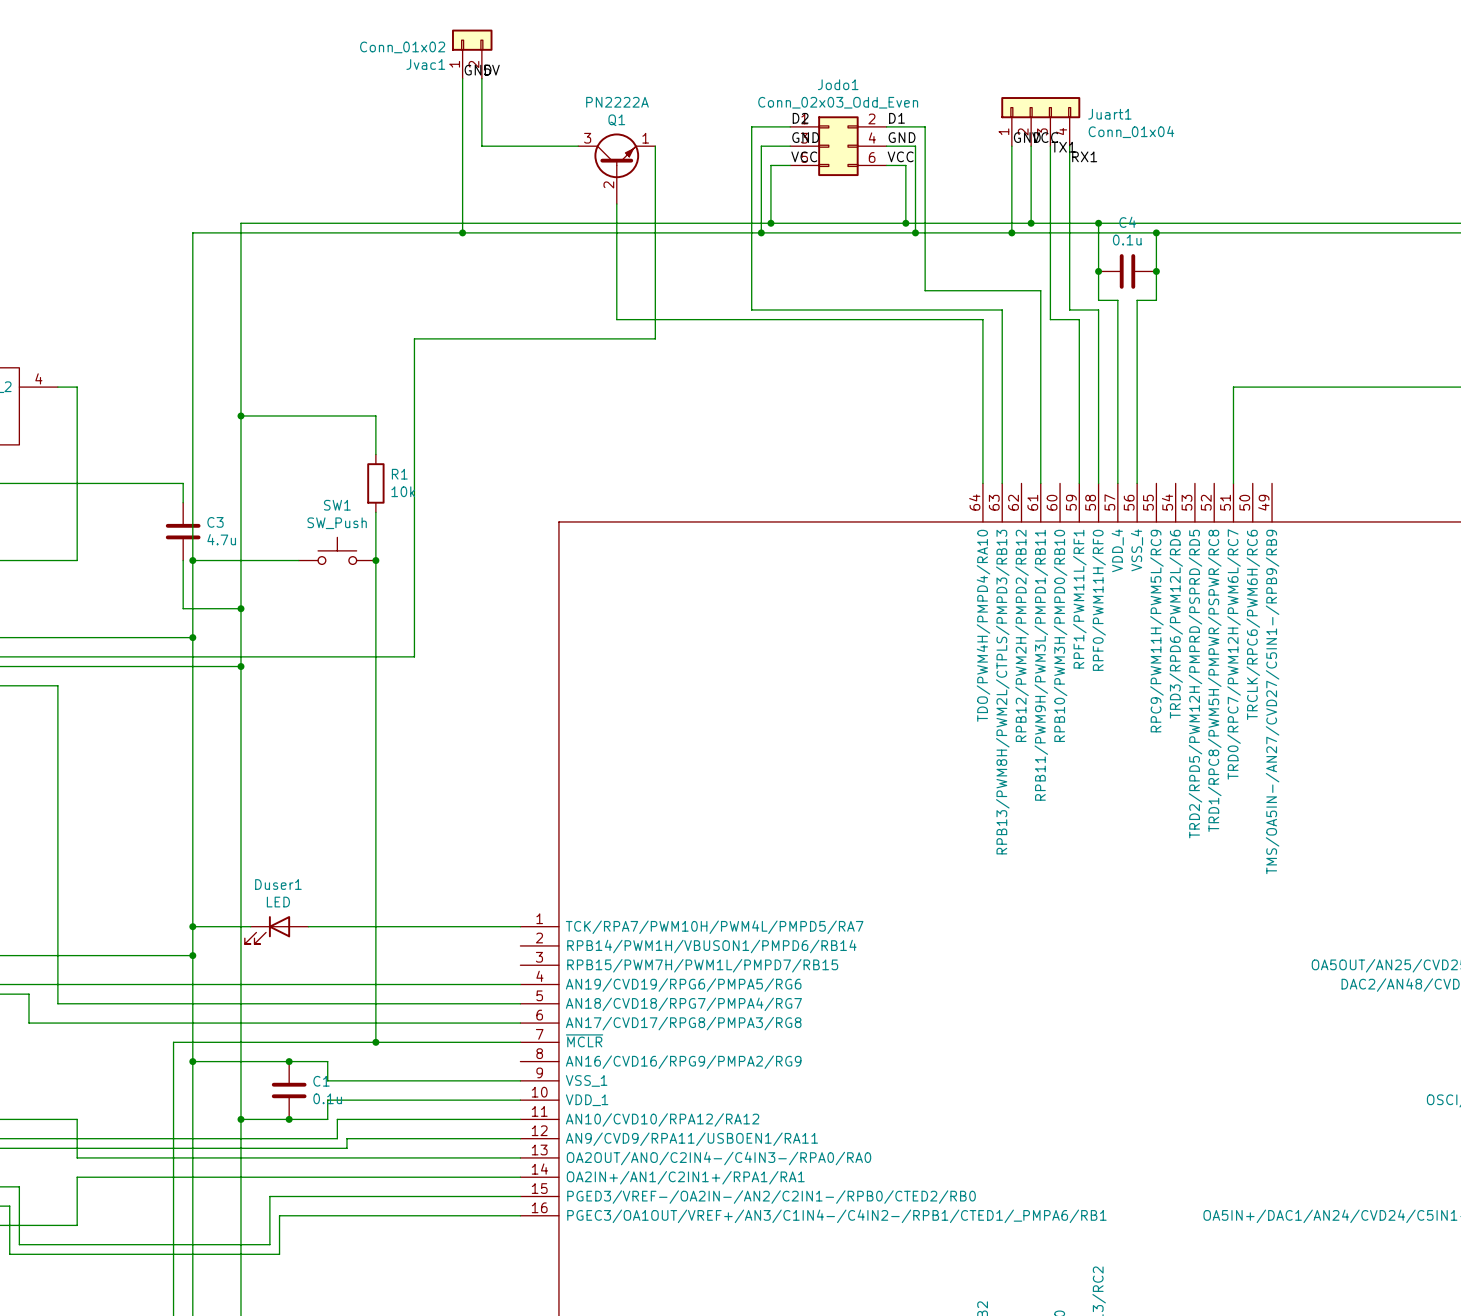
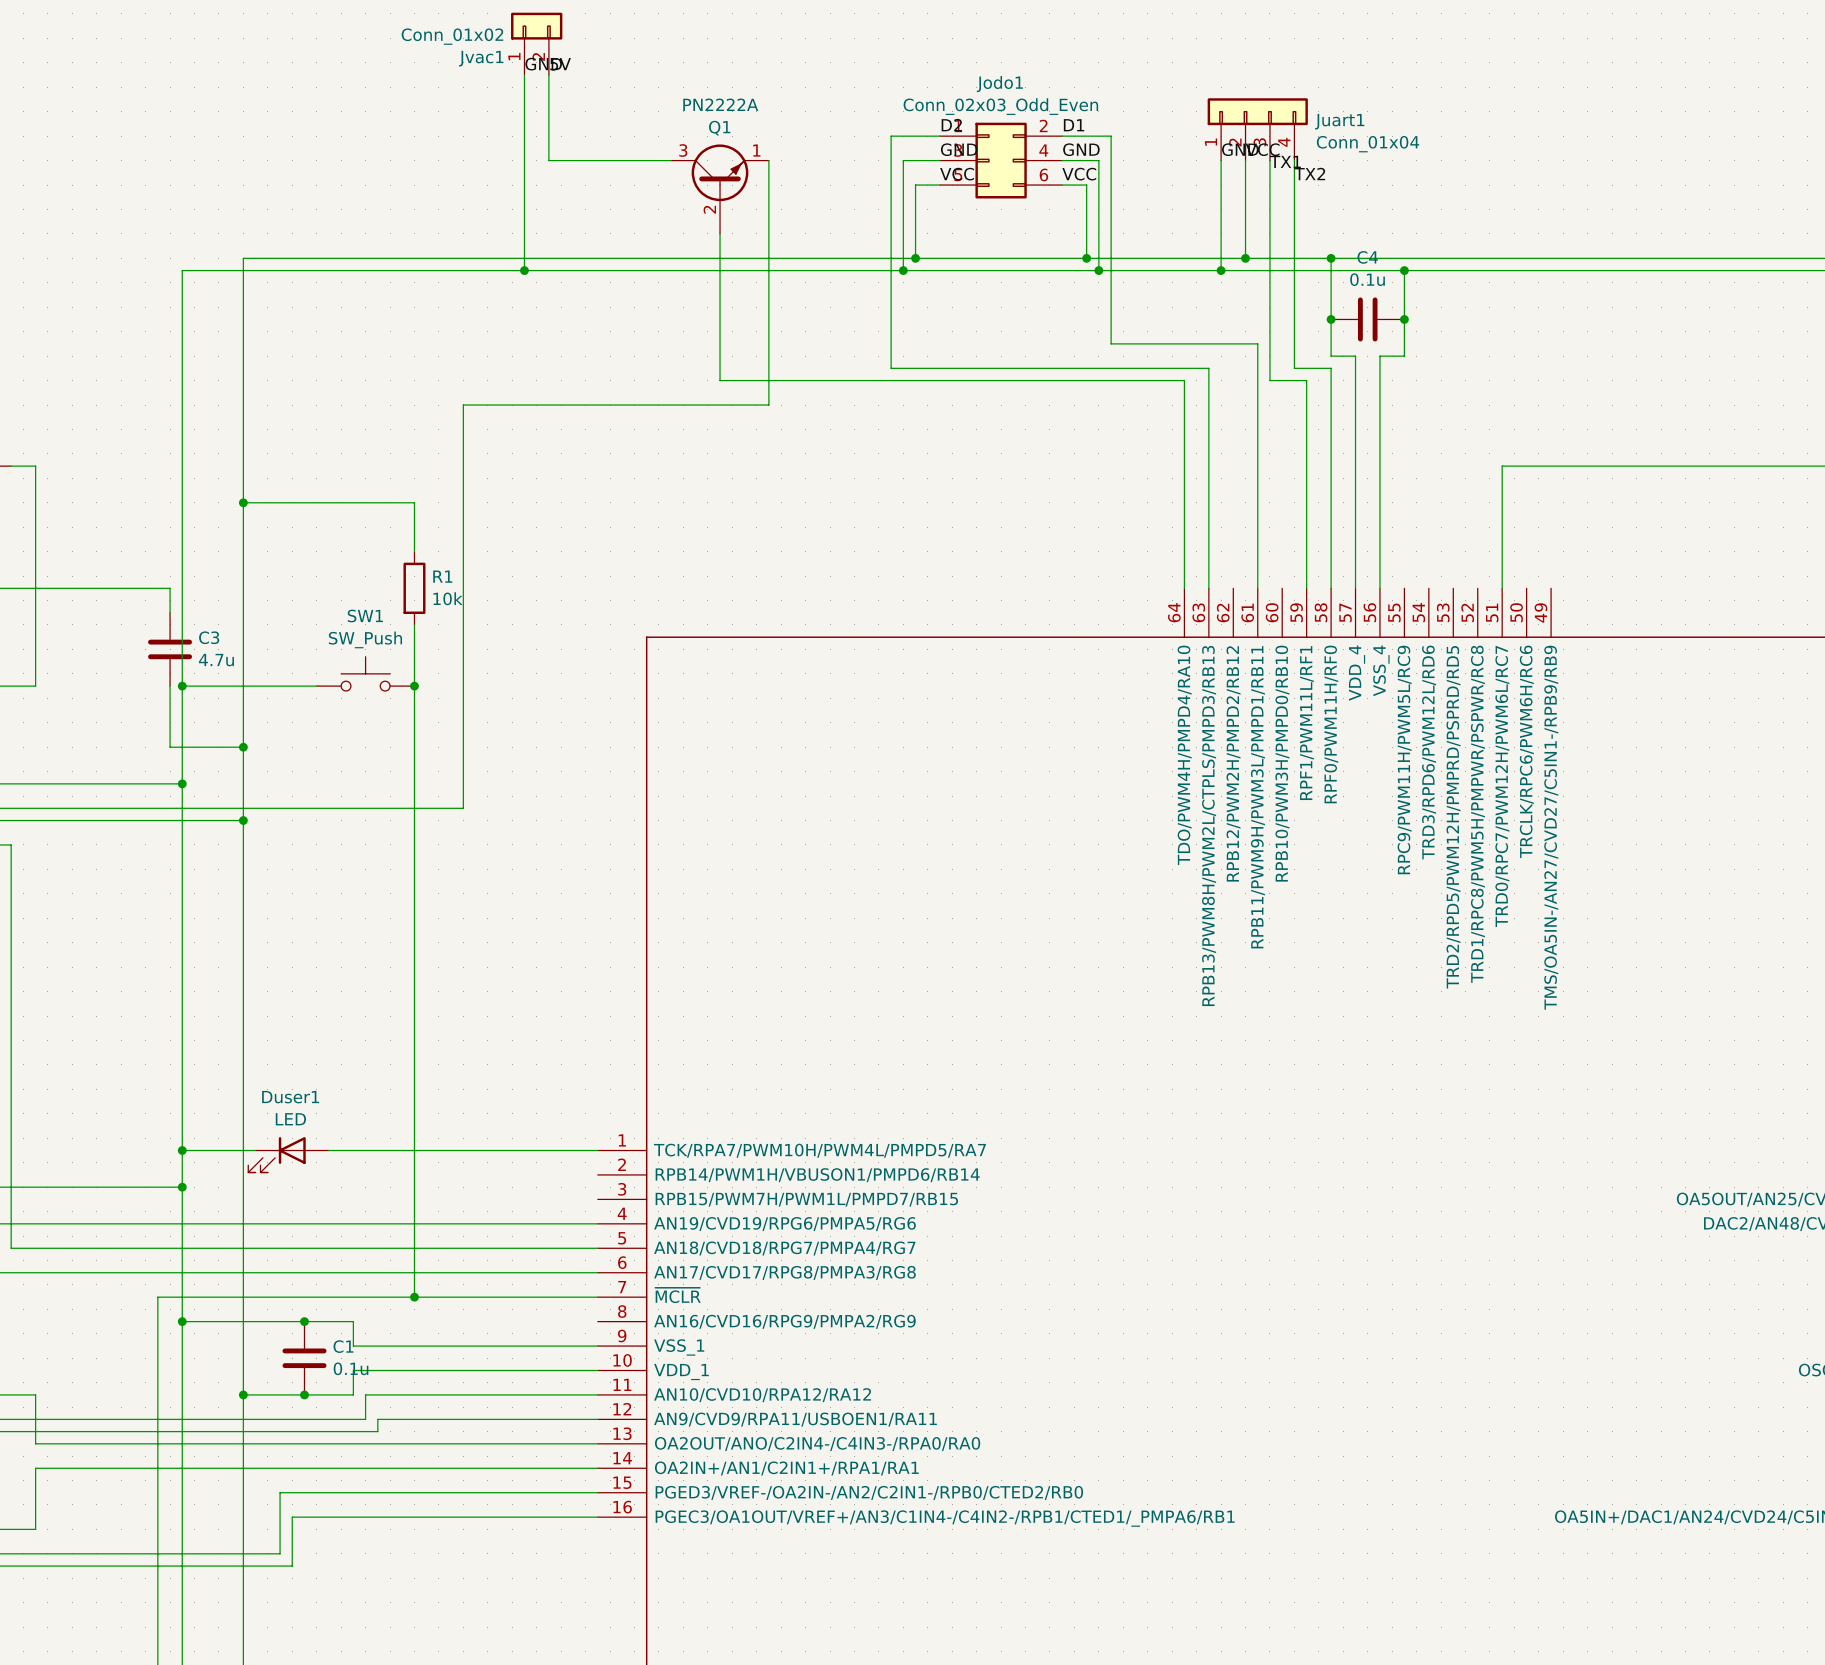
label: RX1 (1084, 156) -> TX2 (1309, 174)

